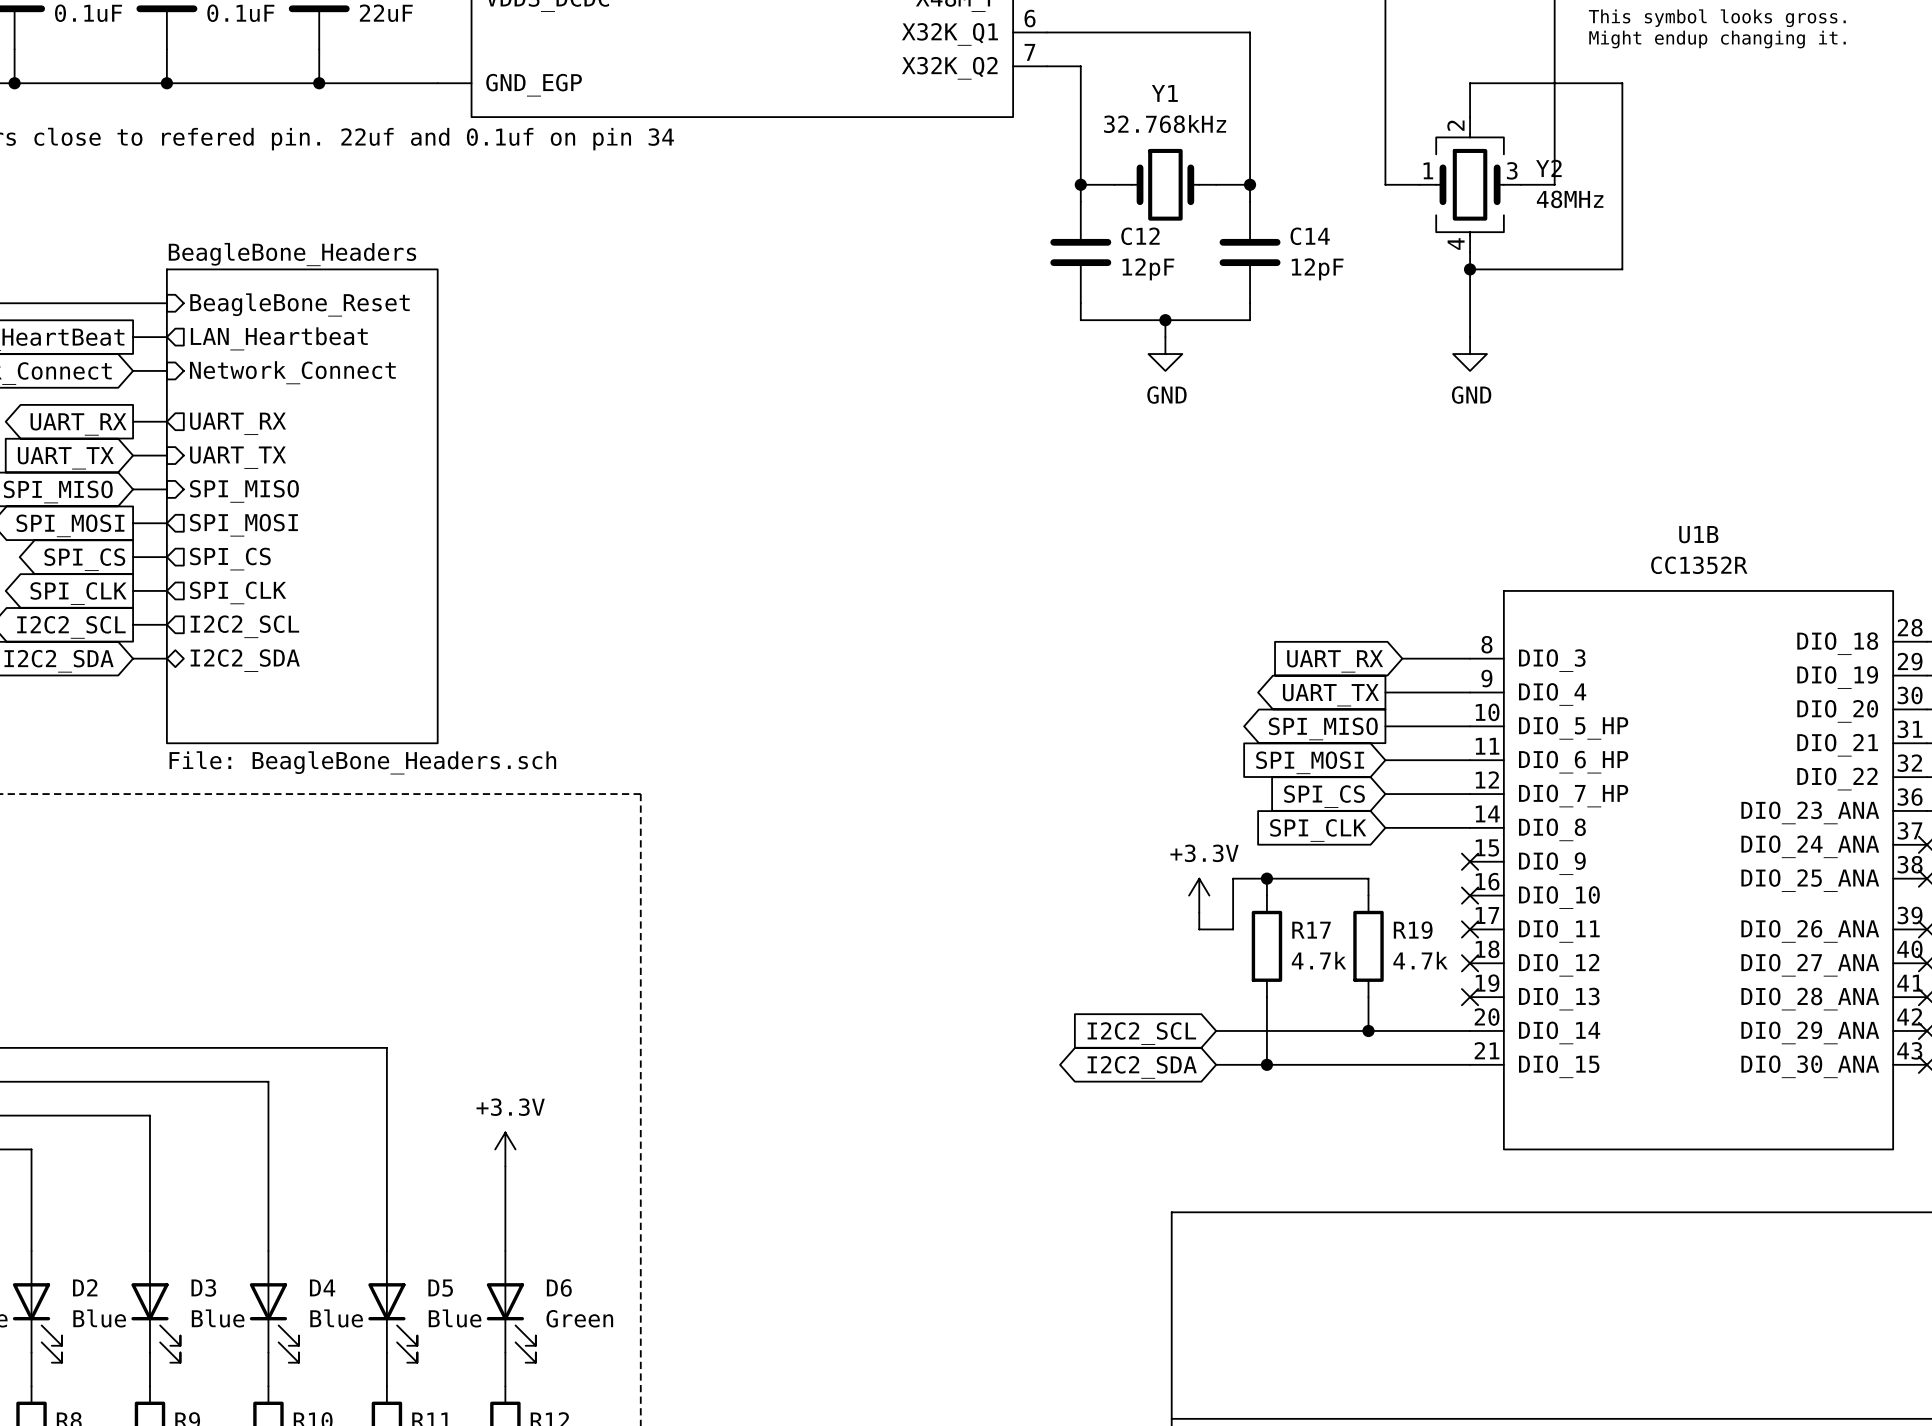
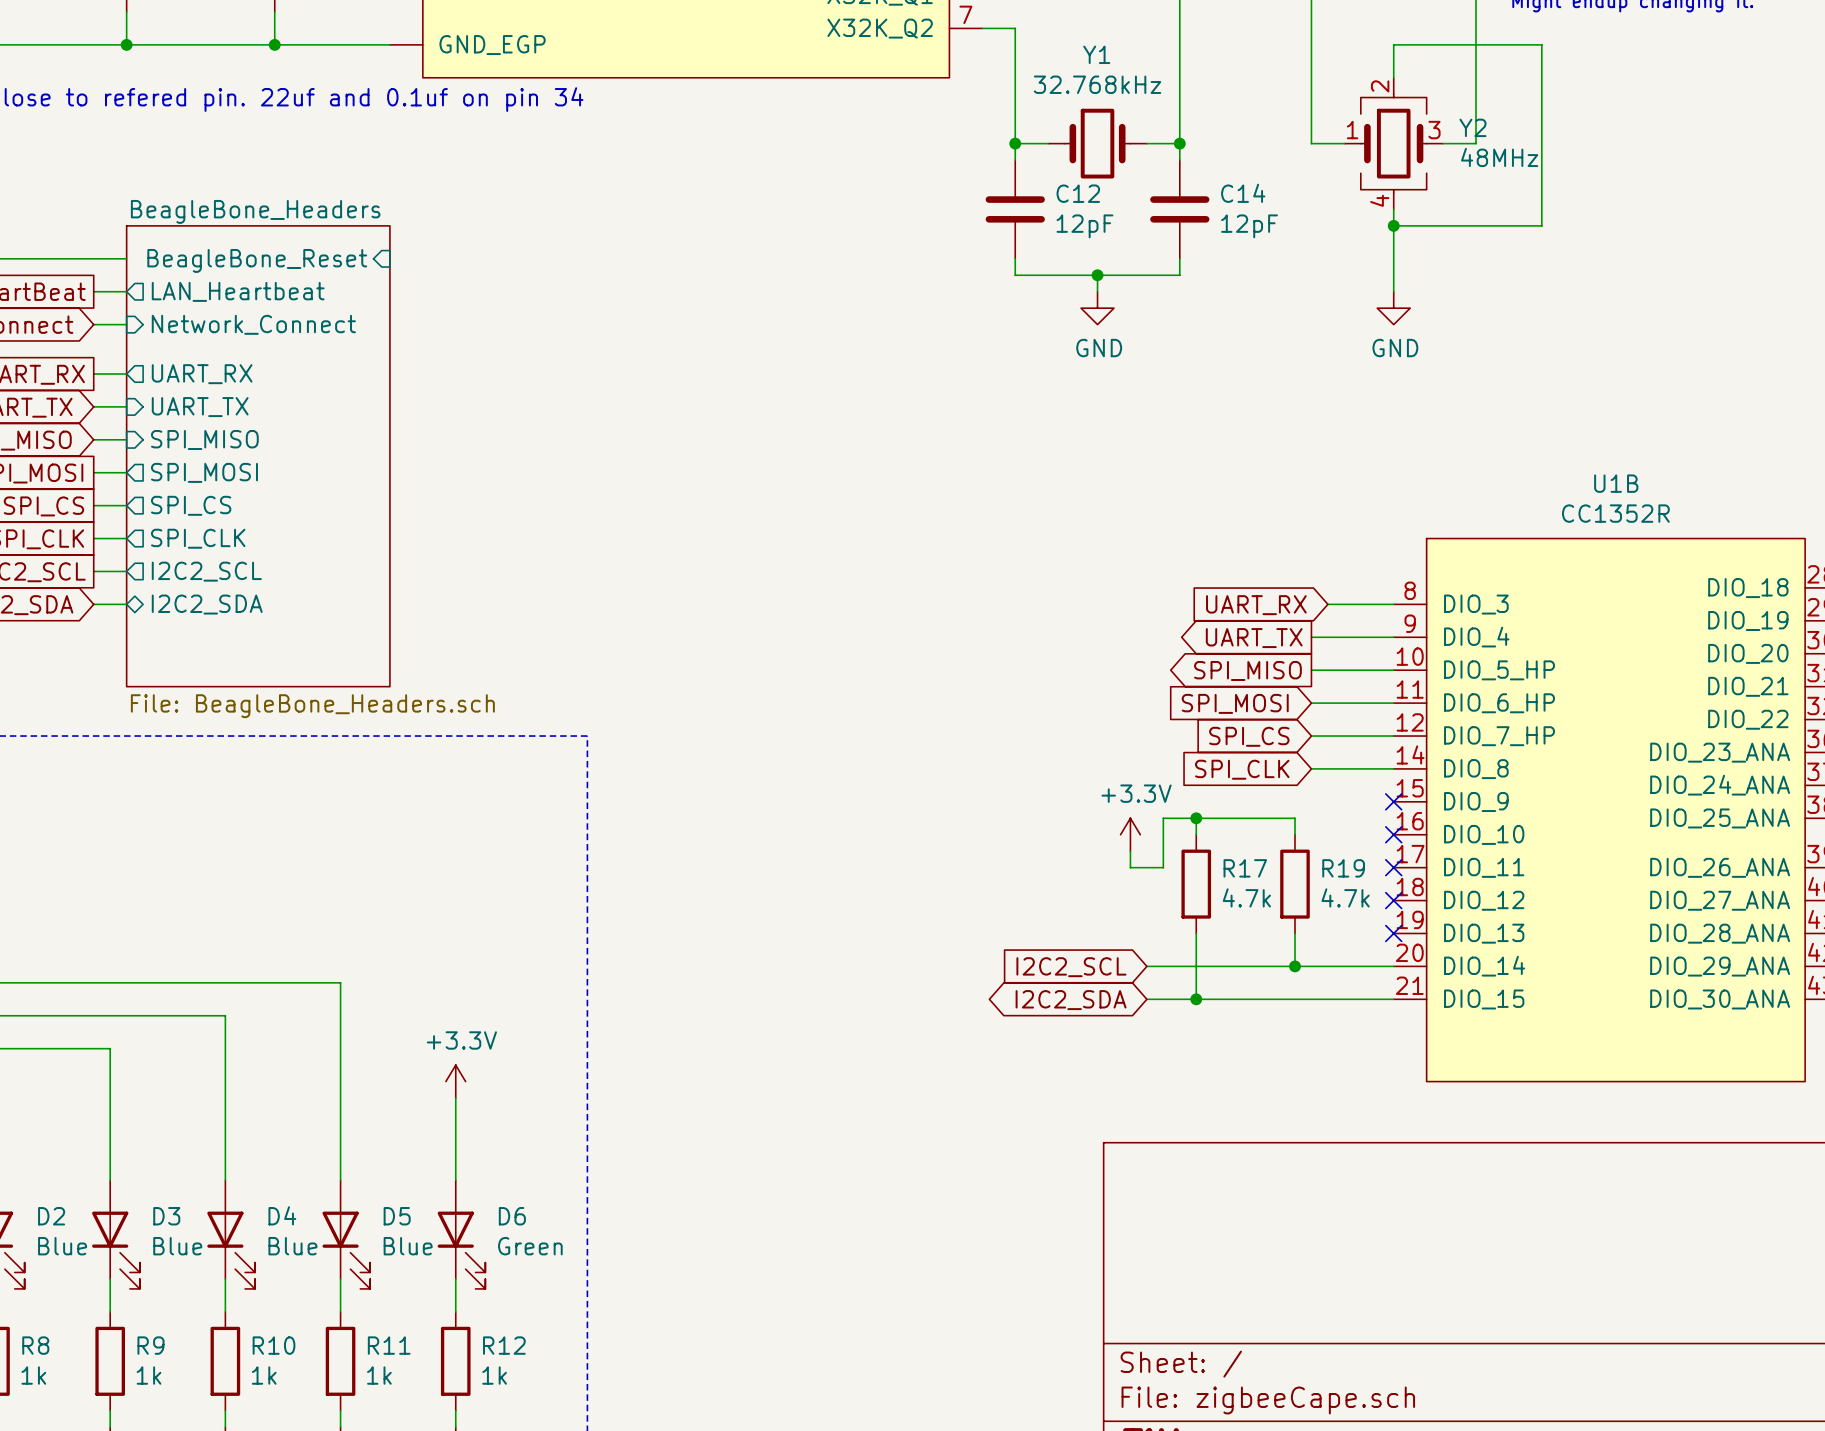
sheet pin rotation: 0° (300, 304) -> 180° (257, 260)

